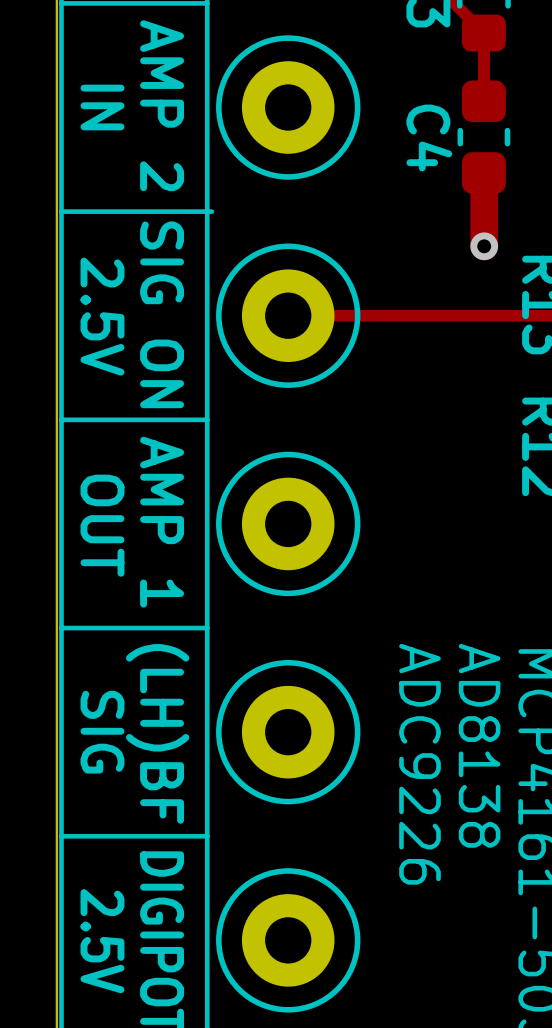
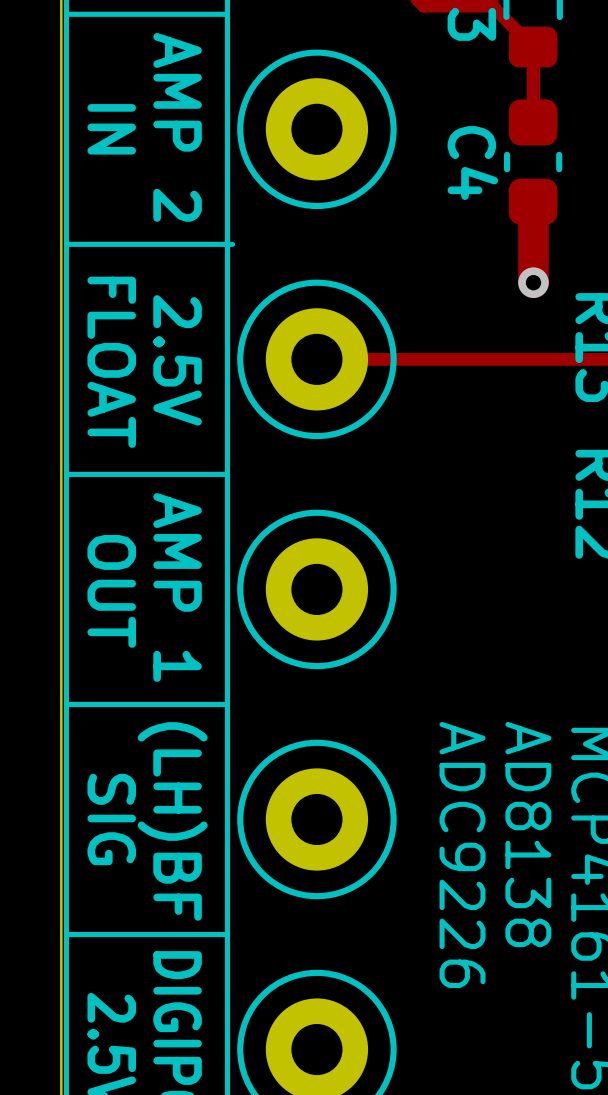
text: SIG ON (162, 314) -> 2.5V (177, 360)
text: 2.5V (102, 316) -> FLOAT (111, 362)

